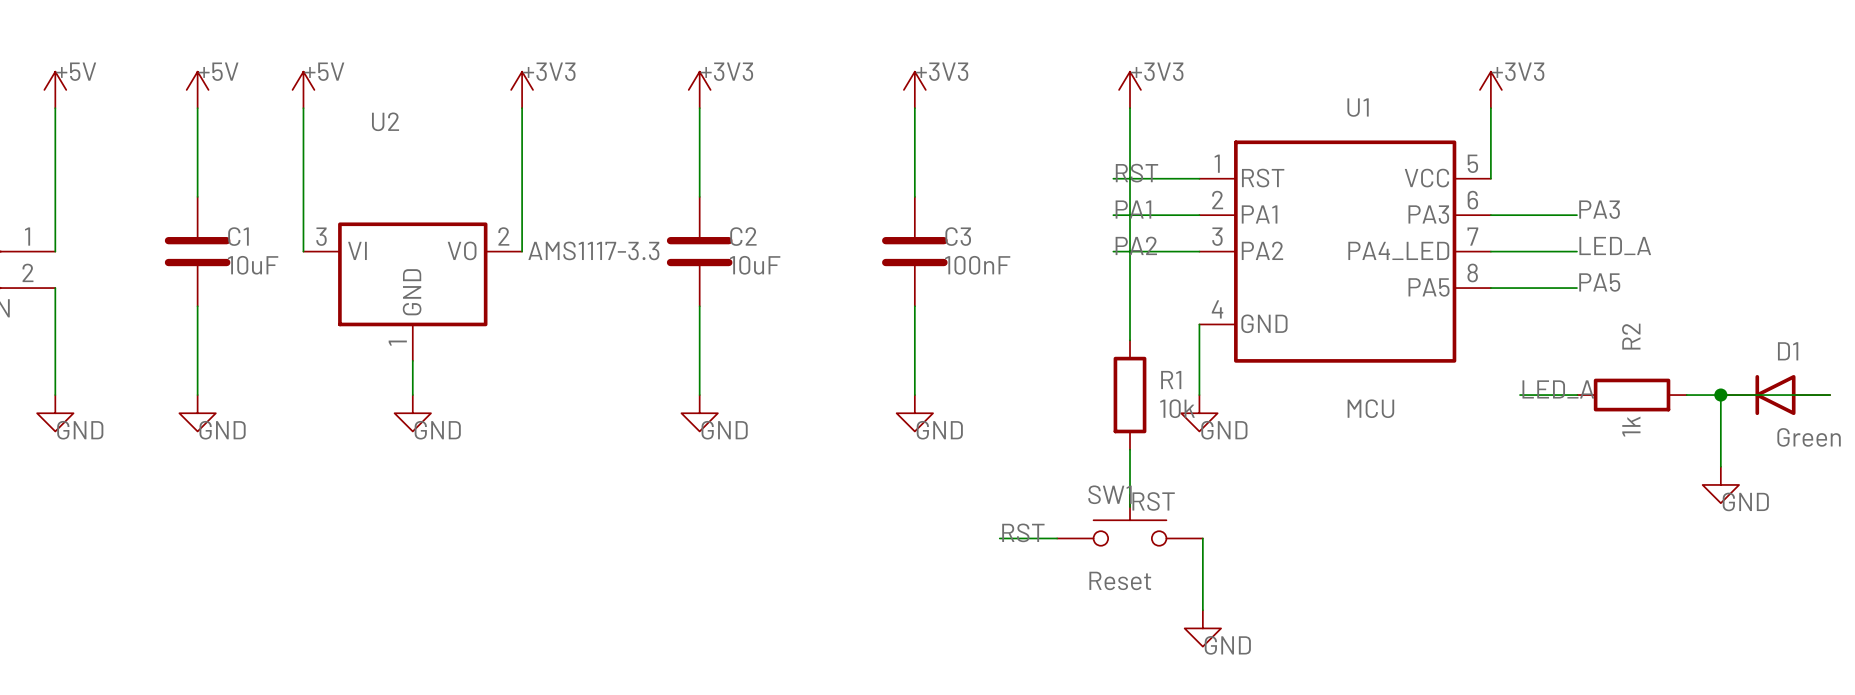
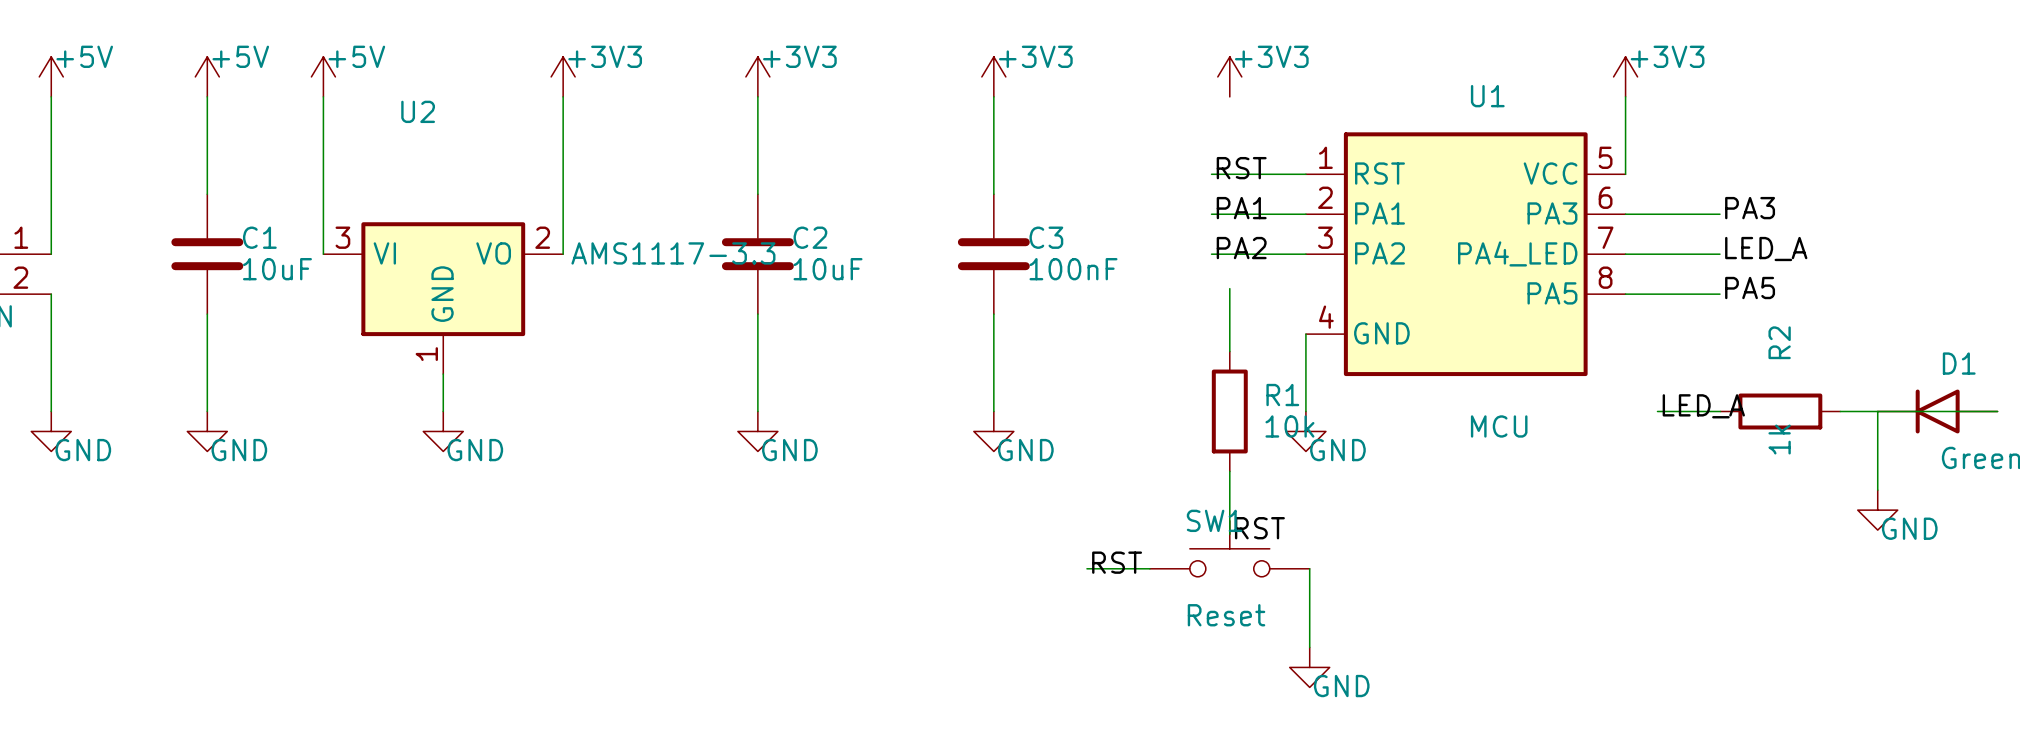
wire: (1130, 108) (1130, 283) -> none
junction: (1720, 395) -> none

